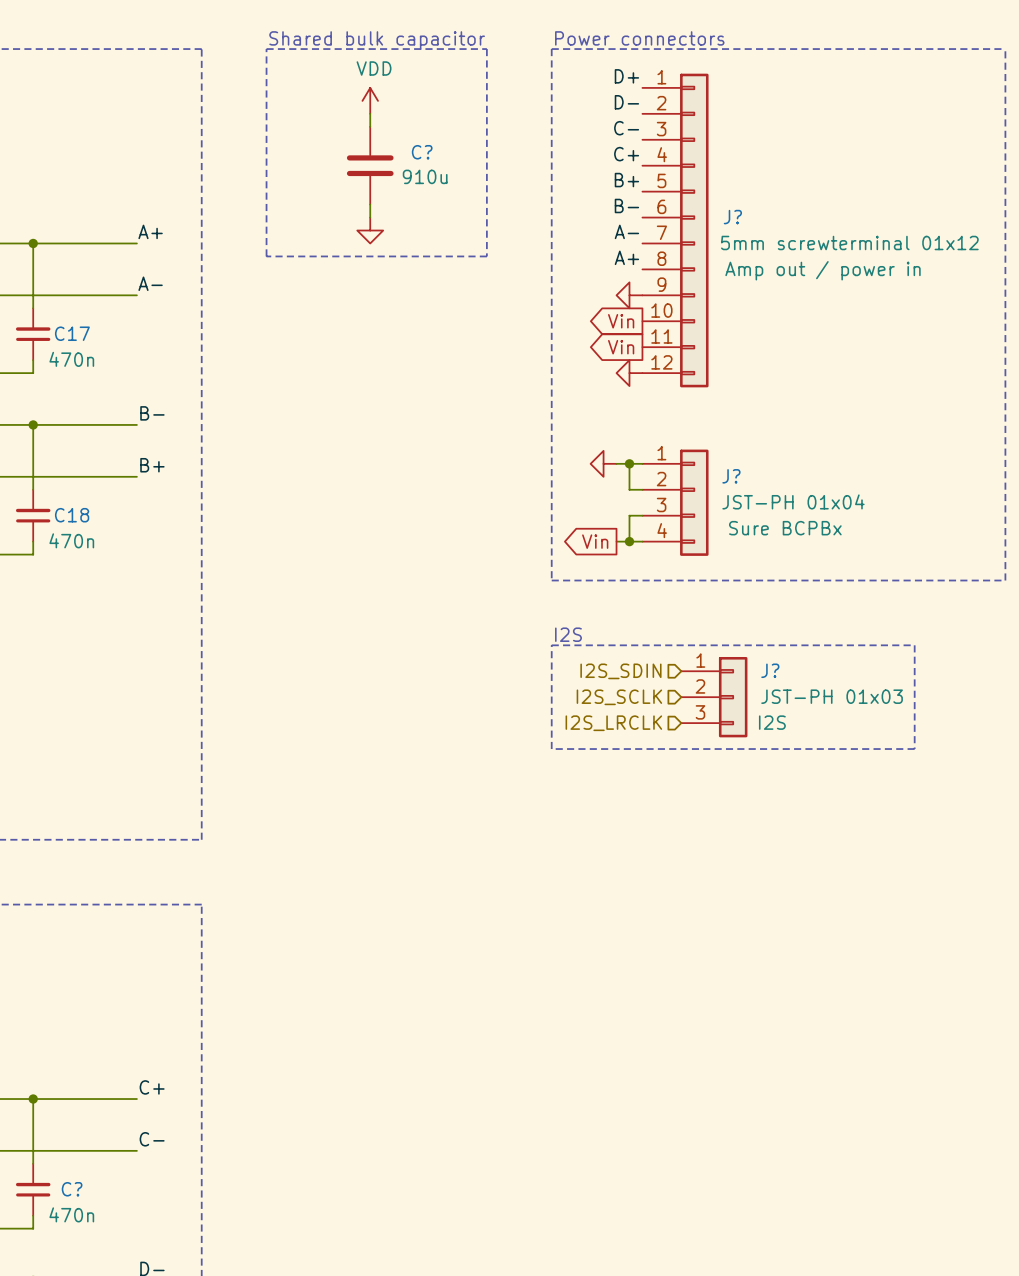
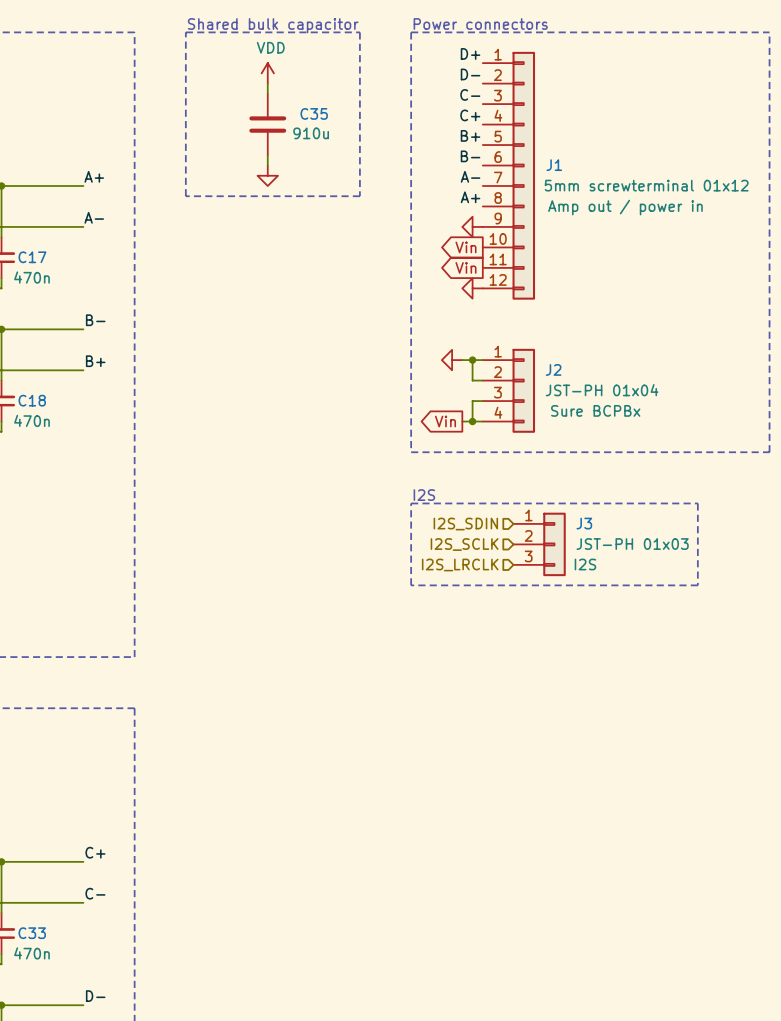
C? name: C? (422, 152) -> C35 (314, 113)
J? name: J? (732, 217) -> J1 (554, 165)
J? name: J? (731, 476) -> J2 (553, 369)
J? name: J? (770, 670) -> J3 (584, 523)
C? name: C? (72, 1189) -> C33 (32, 933)

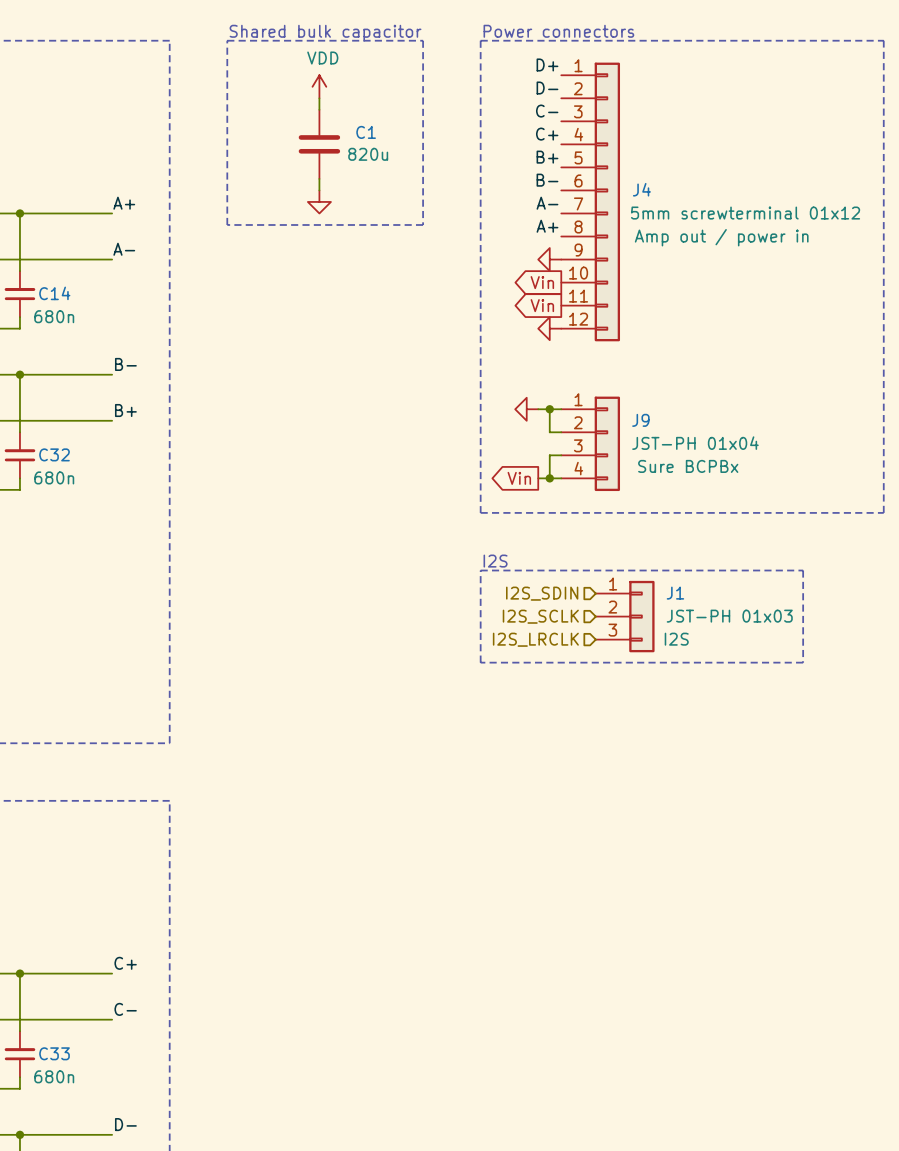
C35 name: C35 (314, 113) -> C1 (366, 132)
C35 value: 910u (311, 133) -> 820u (368, 154)
J1 name: J1 (554, 165) -> J4 (641, 189)
C17 name: C17 (32, 257) -> C14 (54, 293)
C17 value: 470n (31, 277) -> 680n (54, 316)
J2 name: J2 (553, 369) -> J9 (640, 420)
C18 name: C18 (32, 400) -> C32 (54, 454)
C18 value: 470n (31, 420) -> 680n (54, 477)
J3 name: J3 (584, 523) -> J1 (675, 593)
C33 value: 470n (31, 953) -> 680n (54, 1076)

